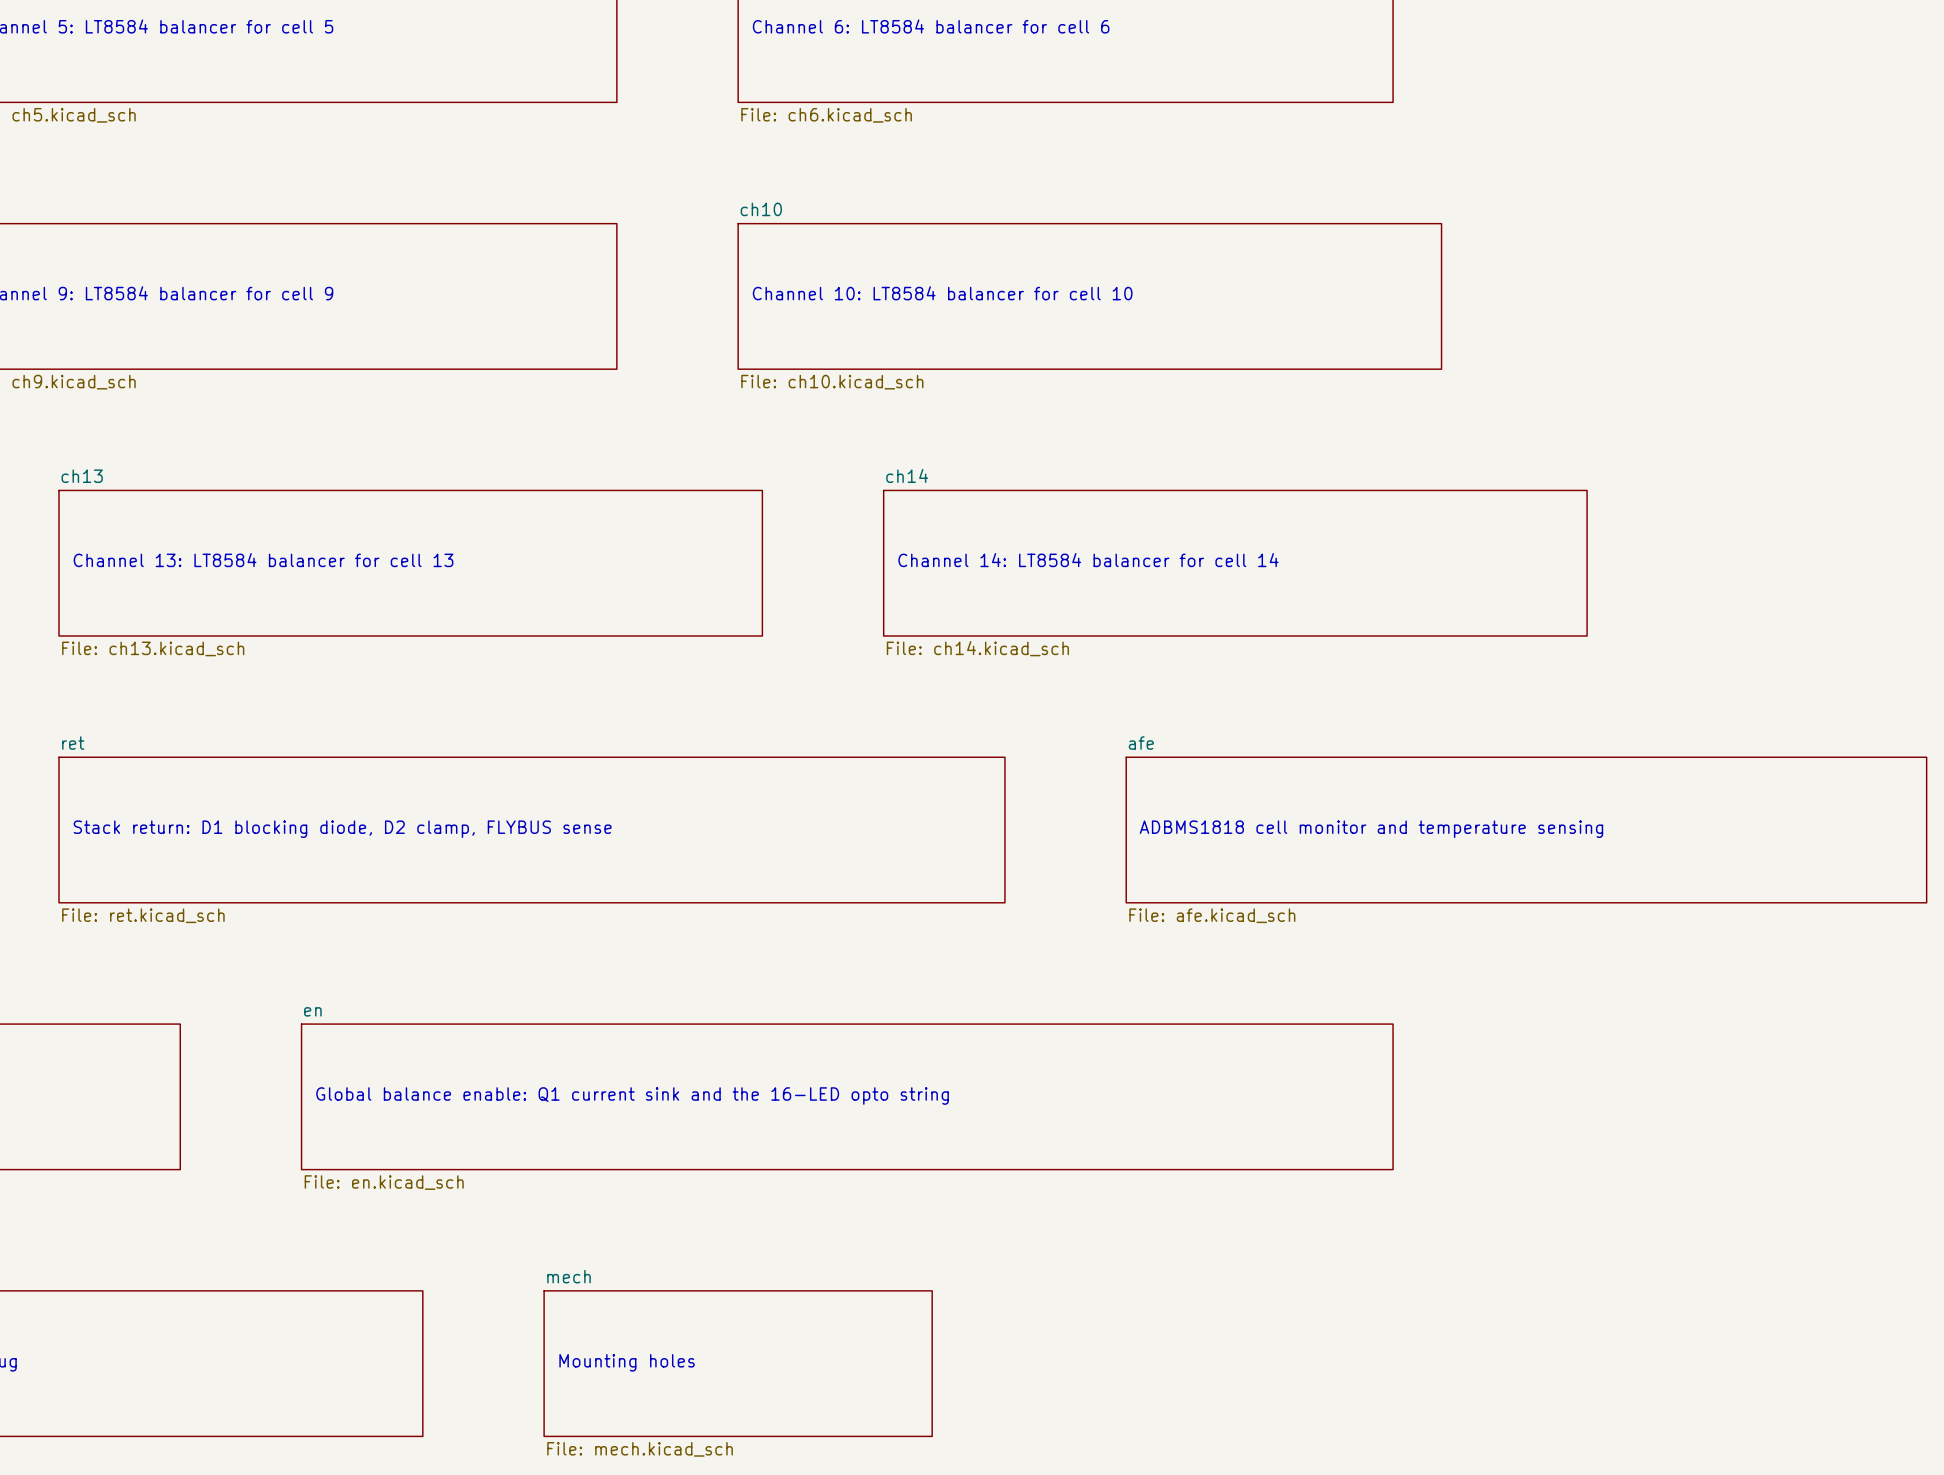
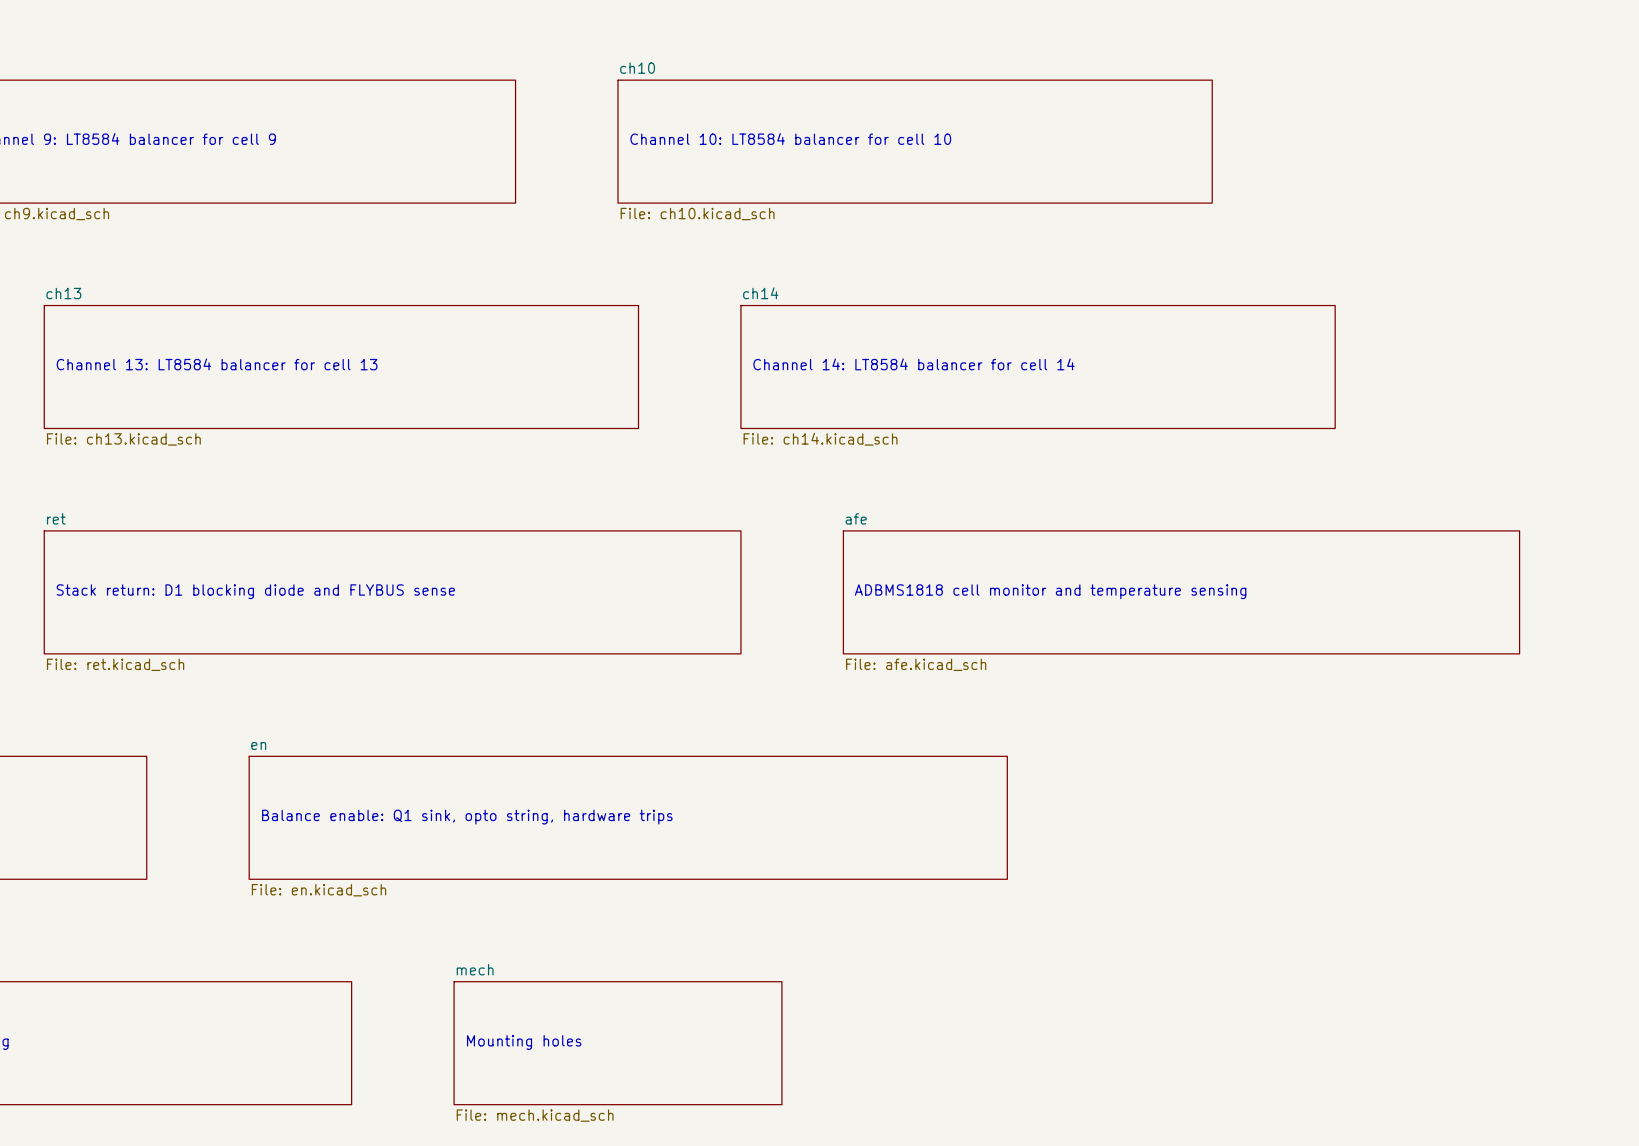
text: Stack return: D1 blocking diode, D2 clamp, FLYBUS sense (342, 829) -> Stack return: D1 blocking diode and FLYBUS sense (255, 591)
text position: ADBMS1818 cell monitor and temperature sensing (1371, 829) -> ADBMS1818 cell monitor and temperature sensing (1050, 591)
sheet ret: none -> File: ret.kicad_sch (392, 592)
sheet ret: File: ret.kicad_sch (531, 830) -> none
sheet afe position: (1526, 830) -> (1181, 592)
text: Global balance enable: Q1 current sink and the 16-LED opto string (632, 1096) -> Balance enable: Q1 sink, opto string, hardware trips (467, 817)
sheet en: none -> File: en.kicad_sch (628, 817)
sheet en: File: en.kicad_sch (847, 1096) -> none

